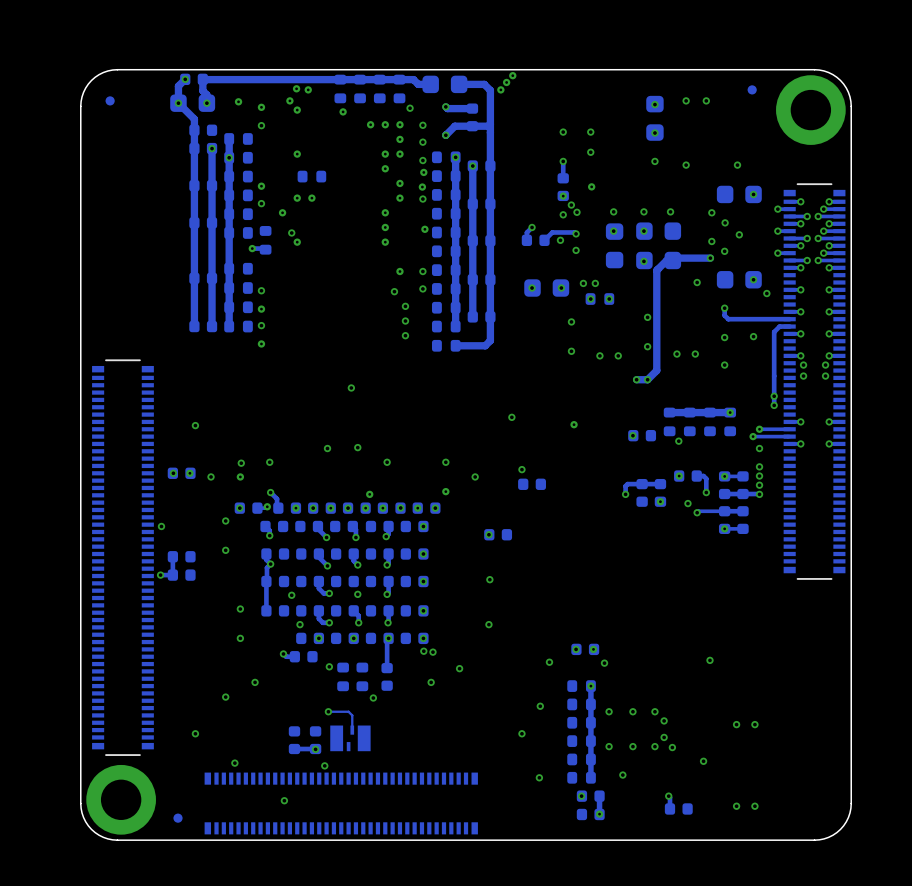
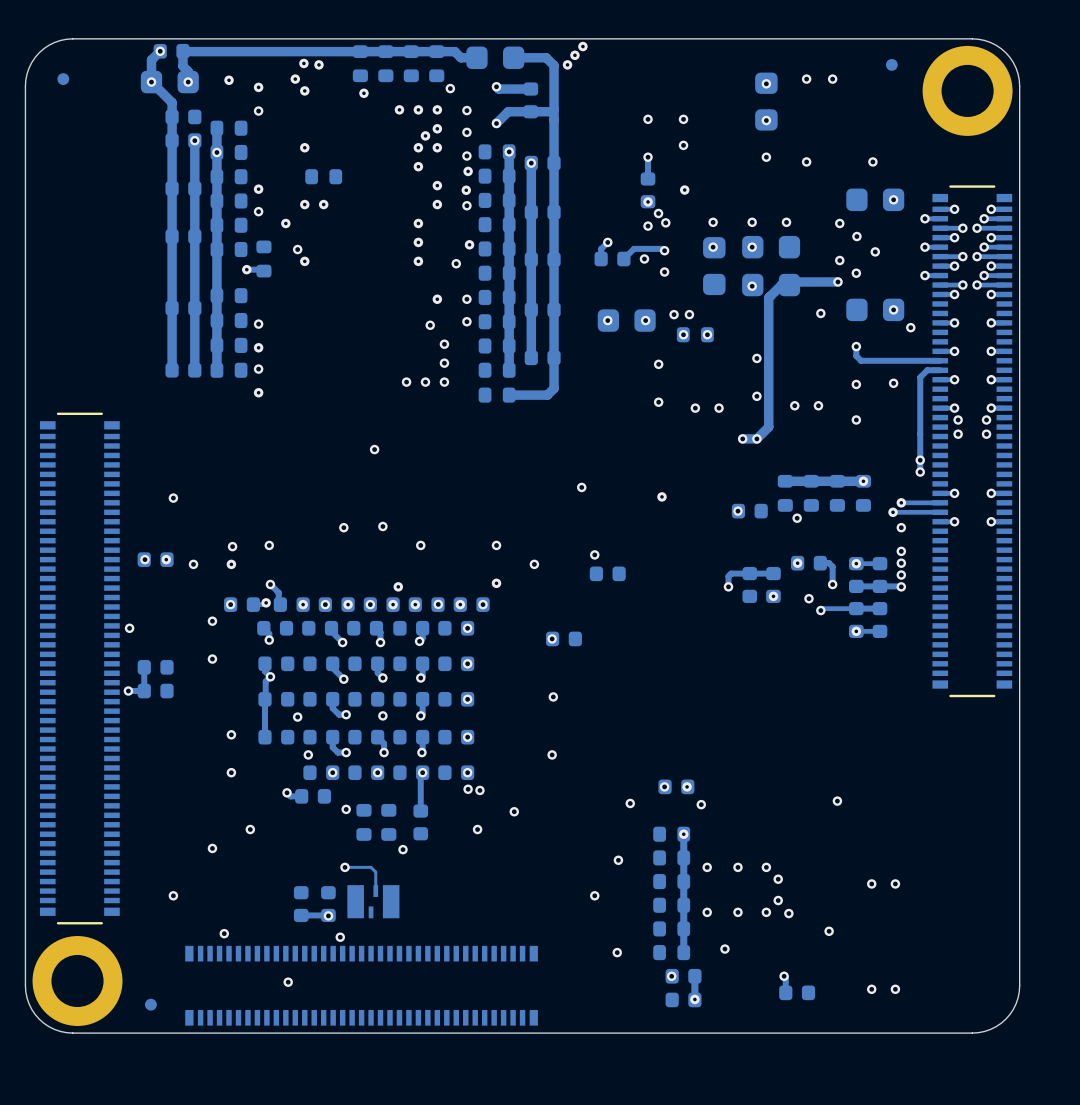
via: none -> (425, 135)
via: none -> (456, 263)
via: none -> (406, 382)
via: none -> (425, 382)

